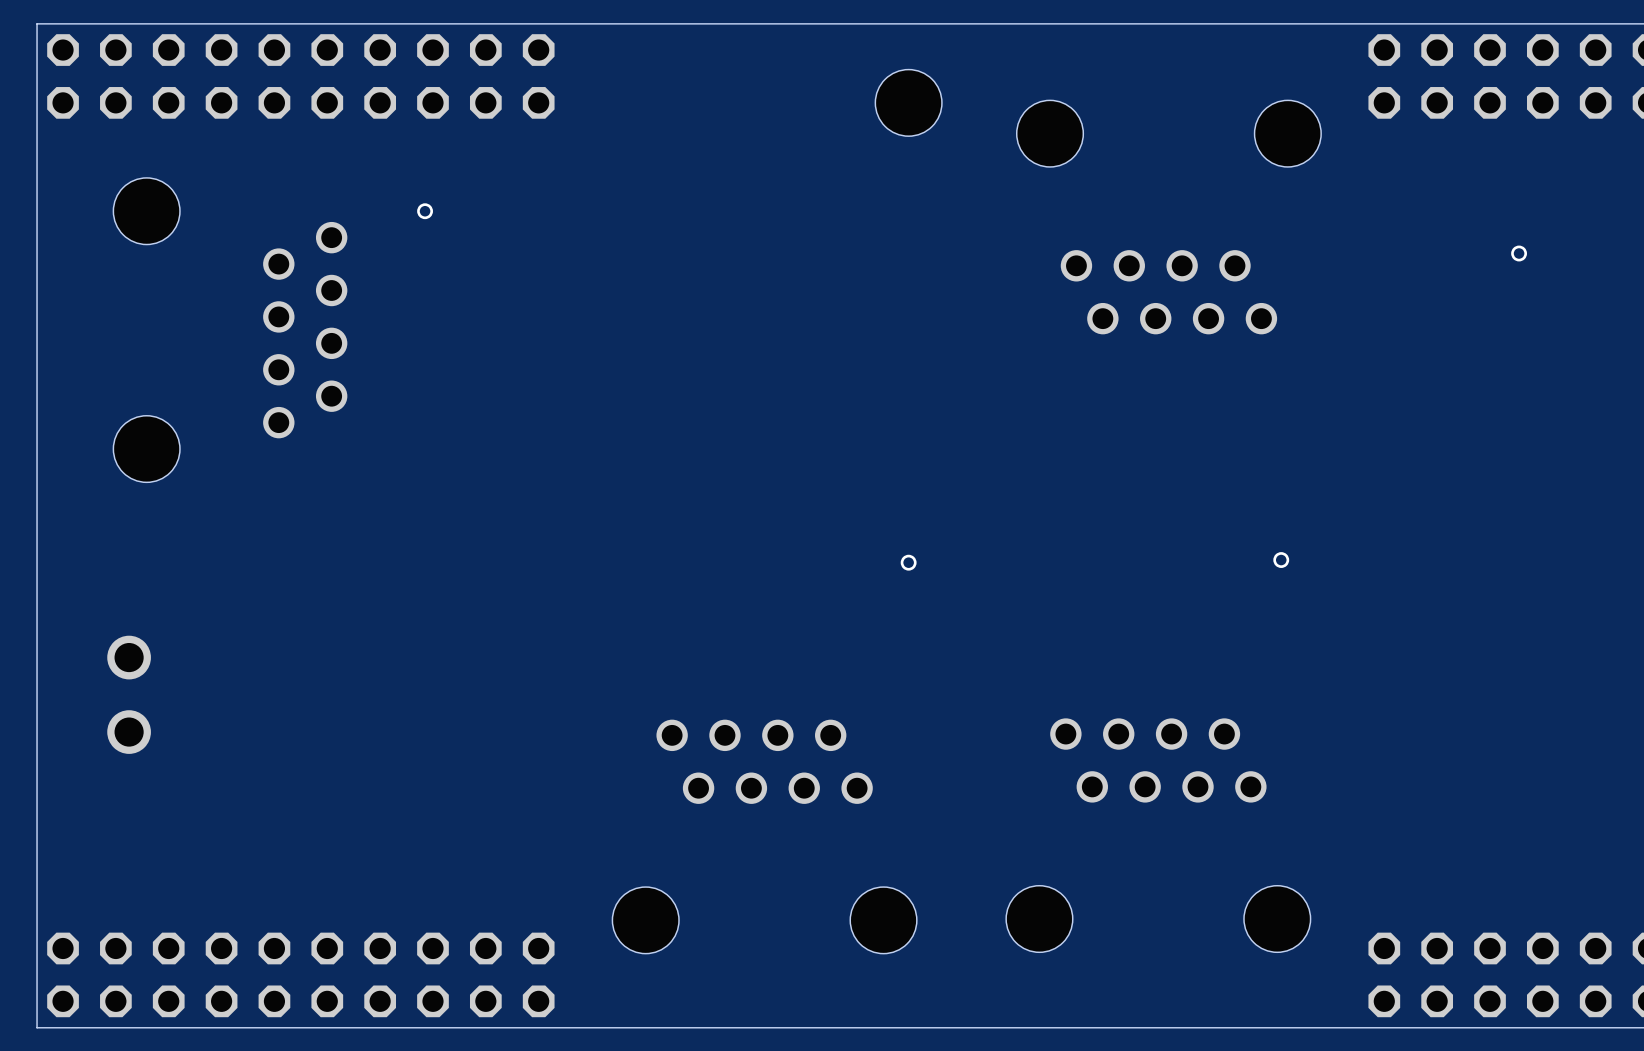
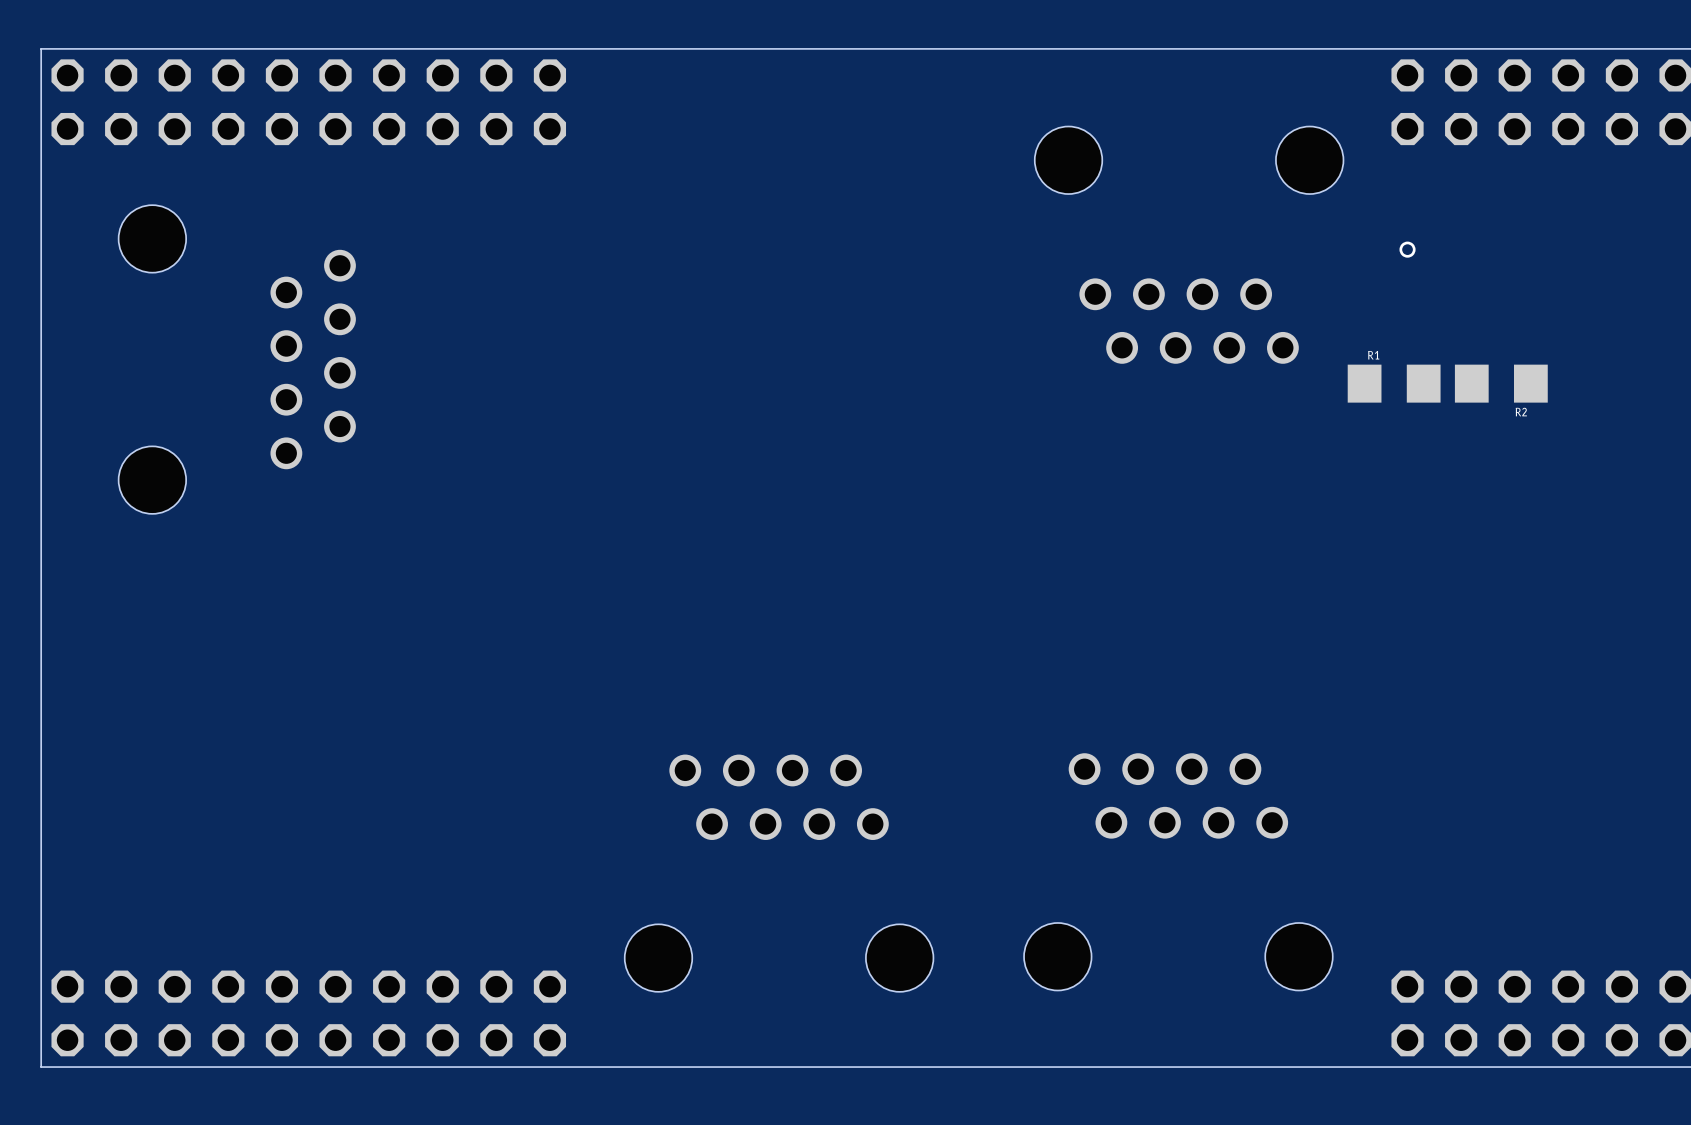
hole: (908, 102) -> none
part: (425, 211) -> none
part position: (1519, 253) -> (1407, 249)
R1: none -> (1394, 383)
R2: none -> (1501, 383)
part: (1281, 560) -> none
part: (908, 562) -> none
part: (129, 694) -> none

